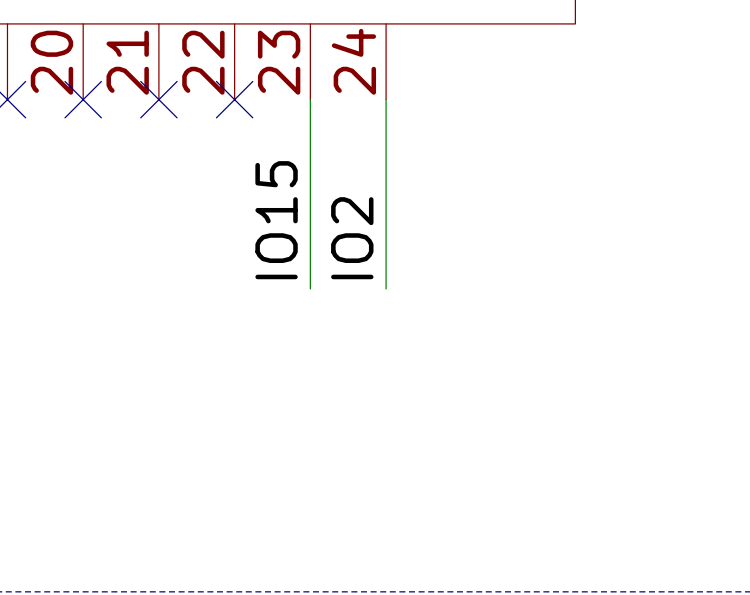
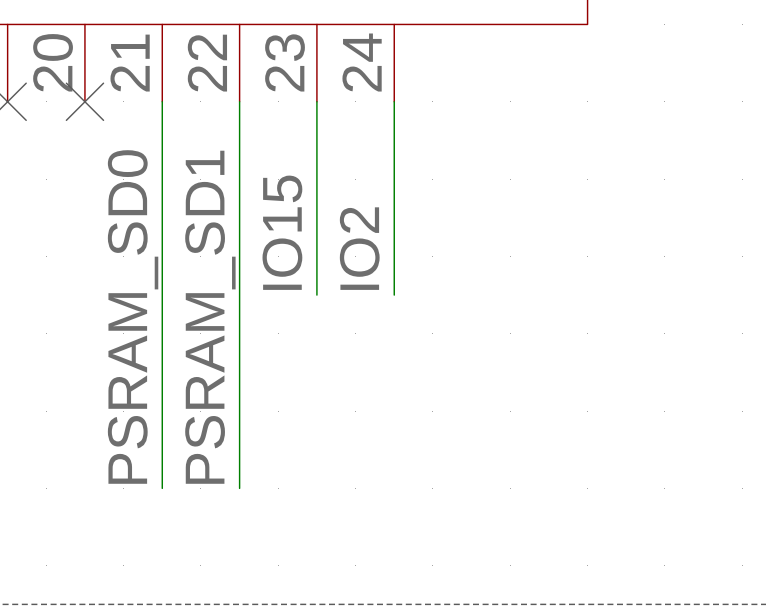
wire: none -> (162, 101) (162, 488)
no-connect mark: (158, 99) -> none
wire: none -> (239, 101) (239, 488)
no-connect mark: (234, 99) -> none
label: none -> PSRAM_SD0 (133, 316)
label: none -> PSRAM_SD1 (210, 317)

